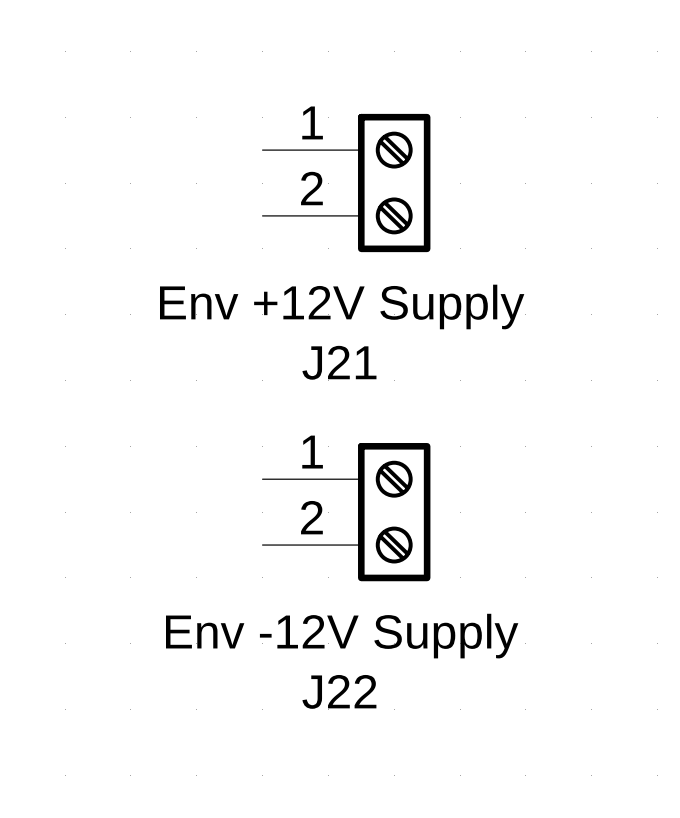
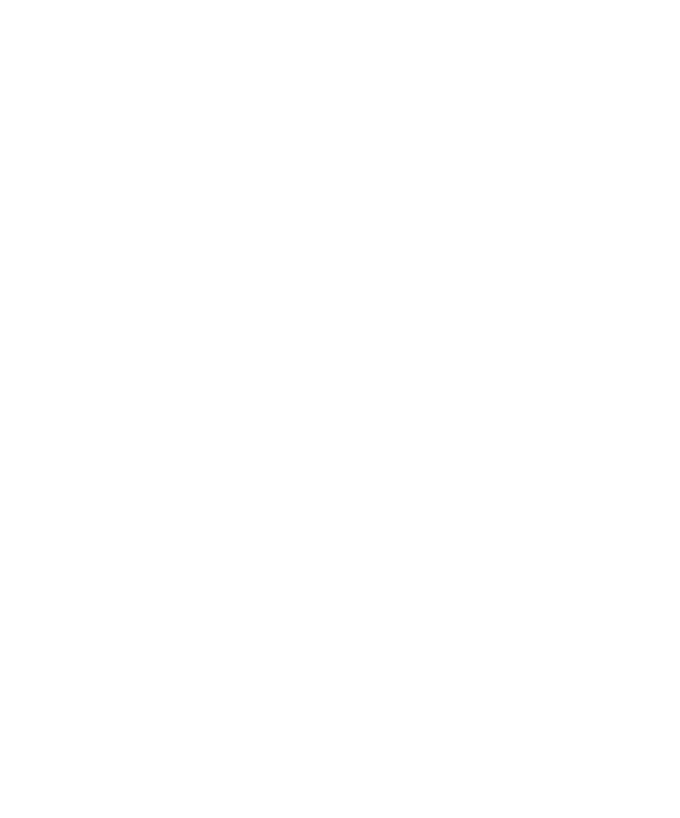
J21: Env +12V Supply (346, 183) -> none
J22: Env -12V Supply (346, 512) -> none

